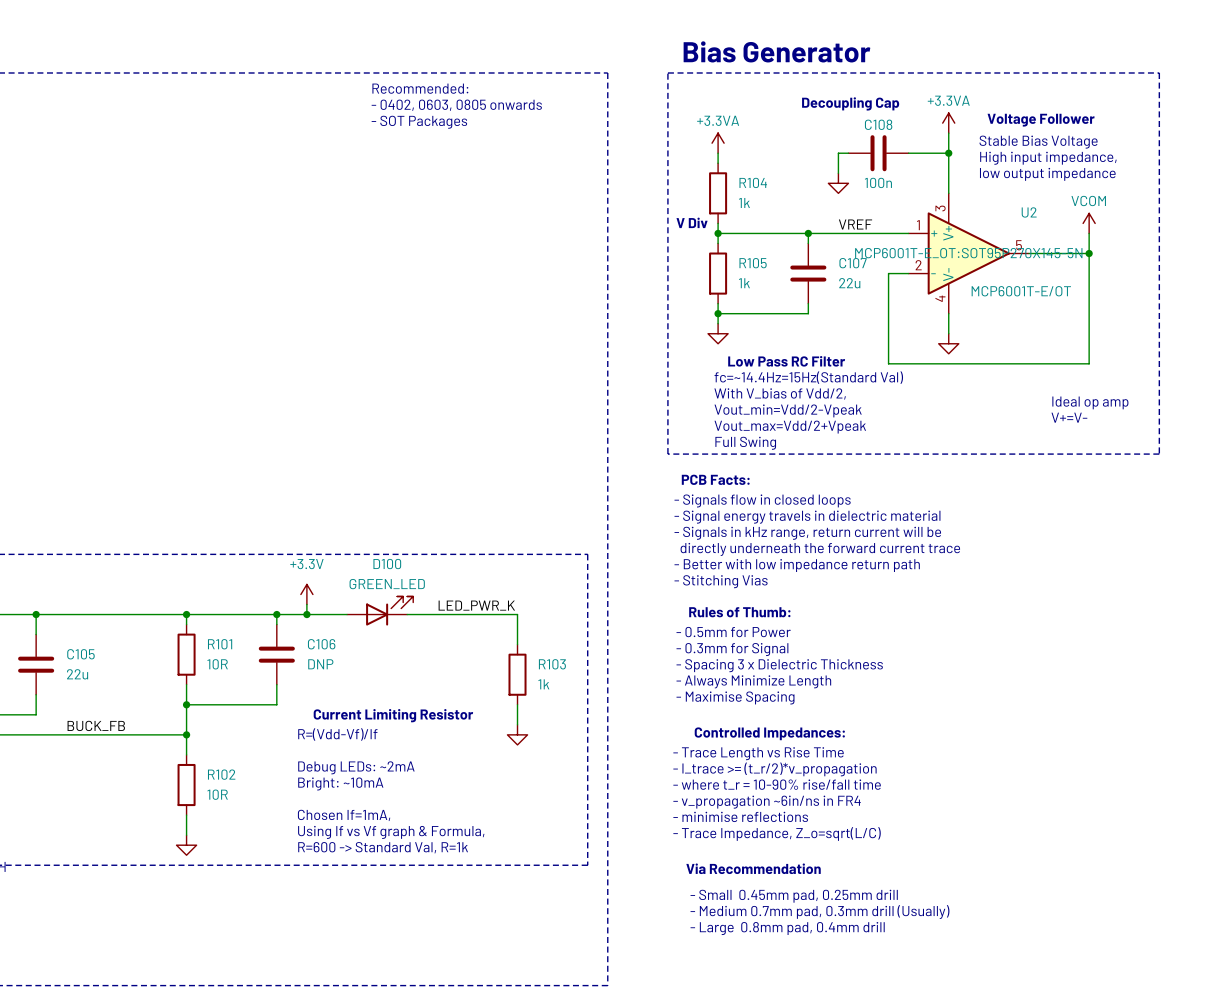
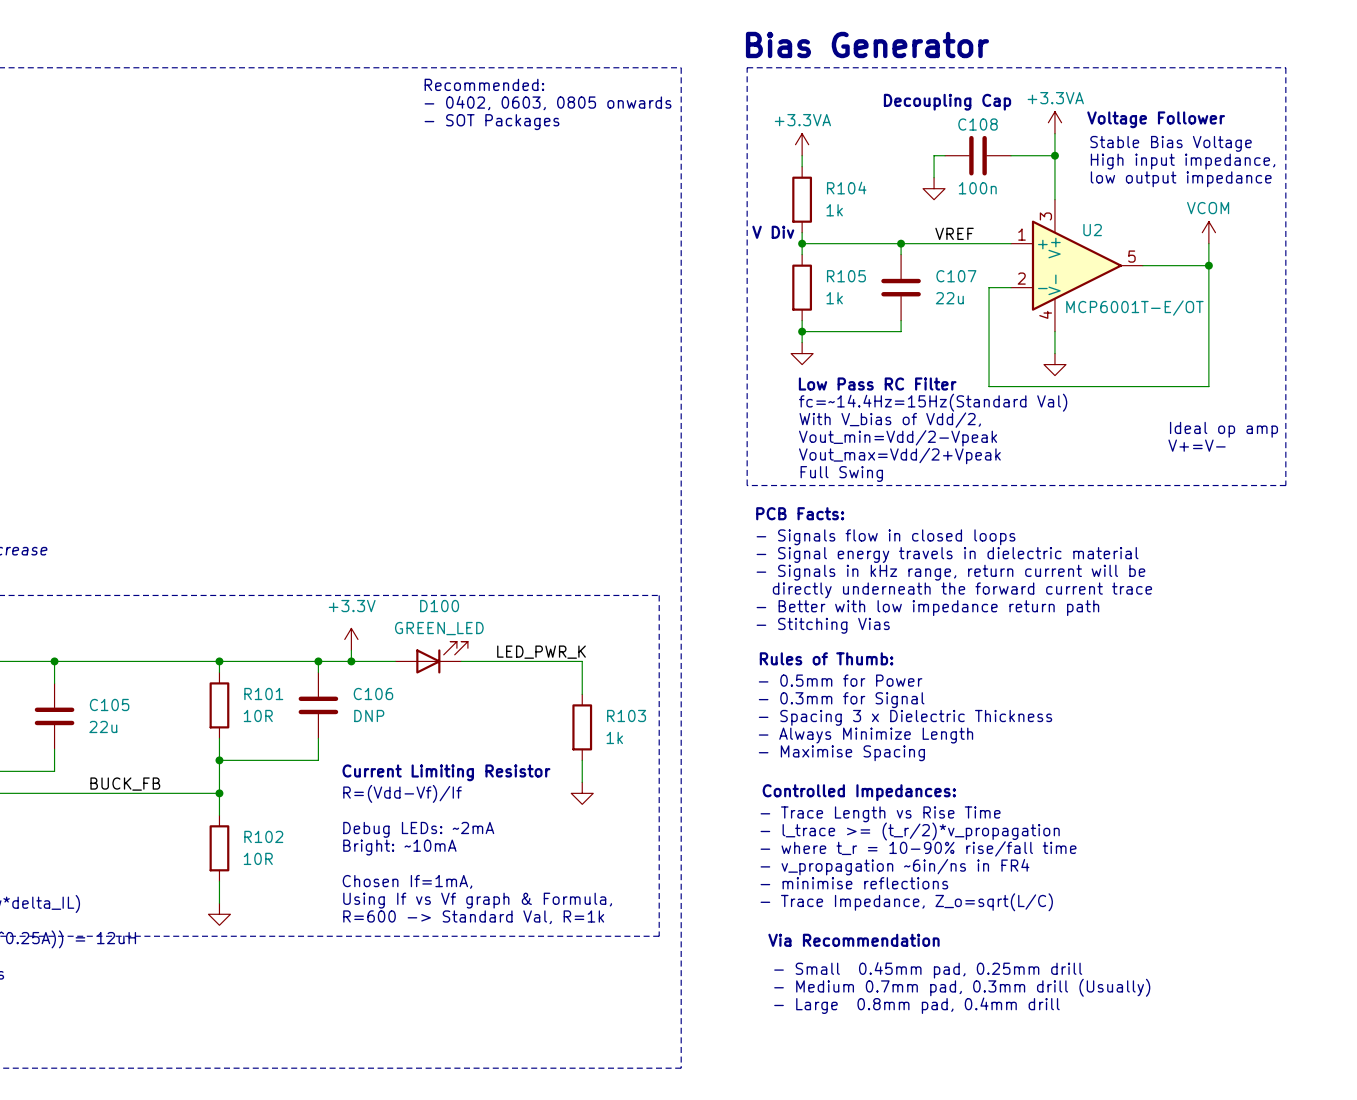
U2 name position: U2 (1029, 212) -> U2 (1092, 230)
U2 text: MCP6001T-E_OT:SOT95P270X145-5N (968, 253) -> none

